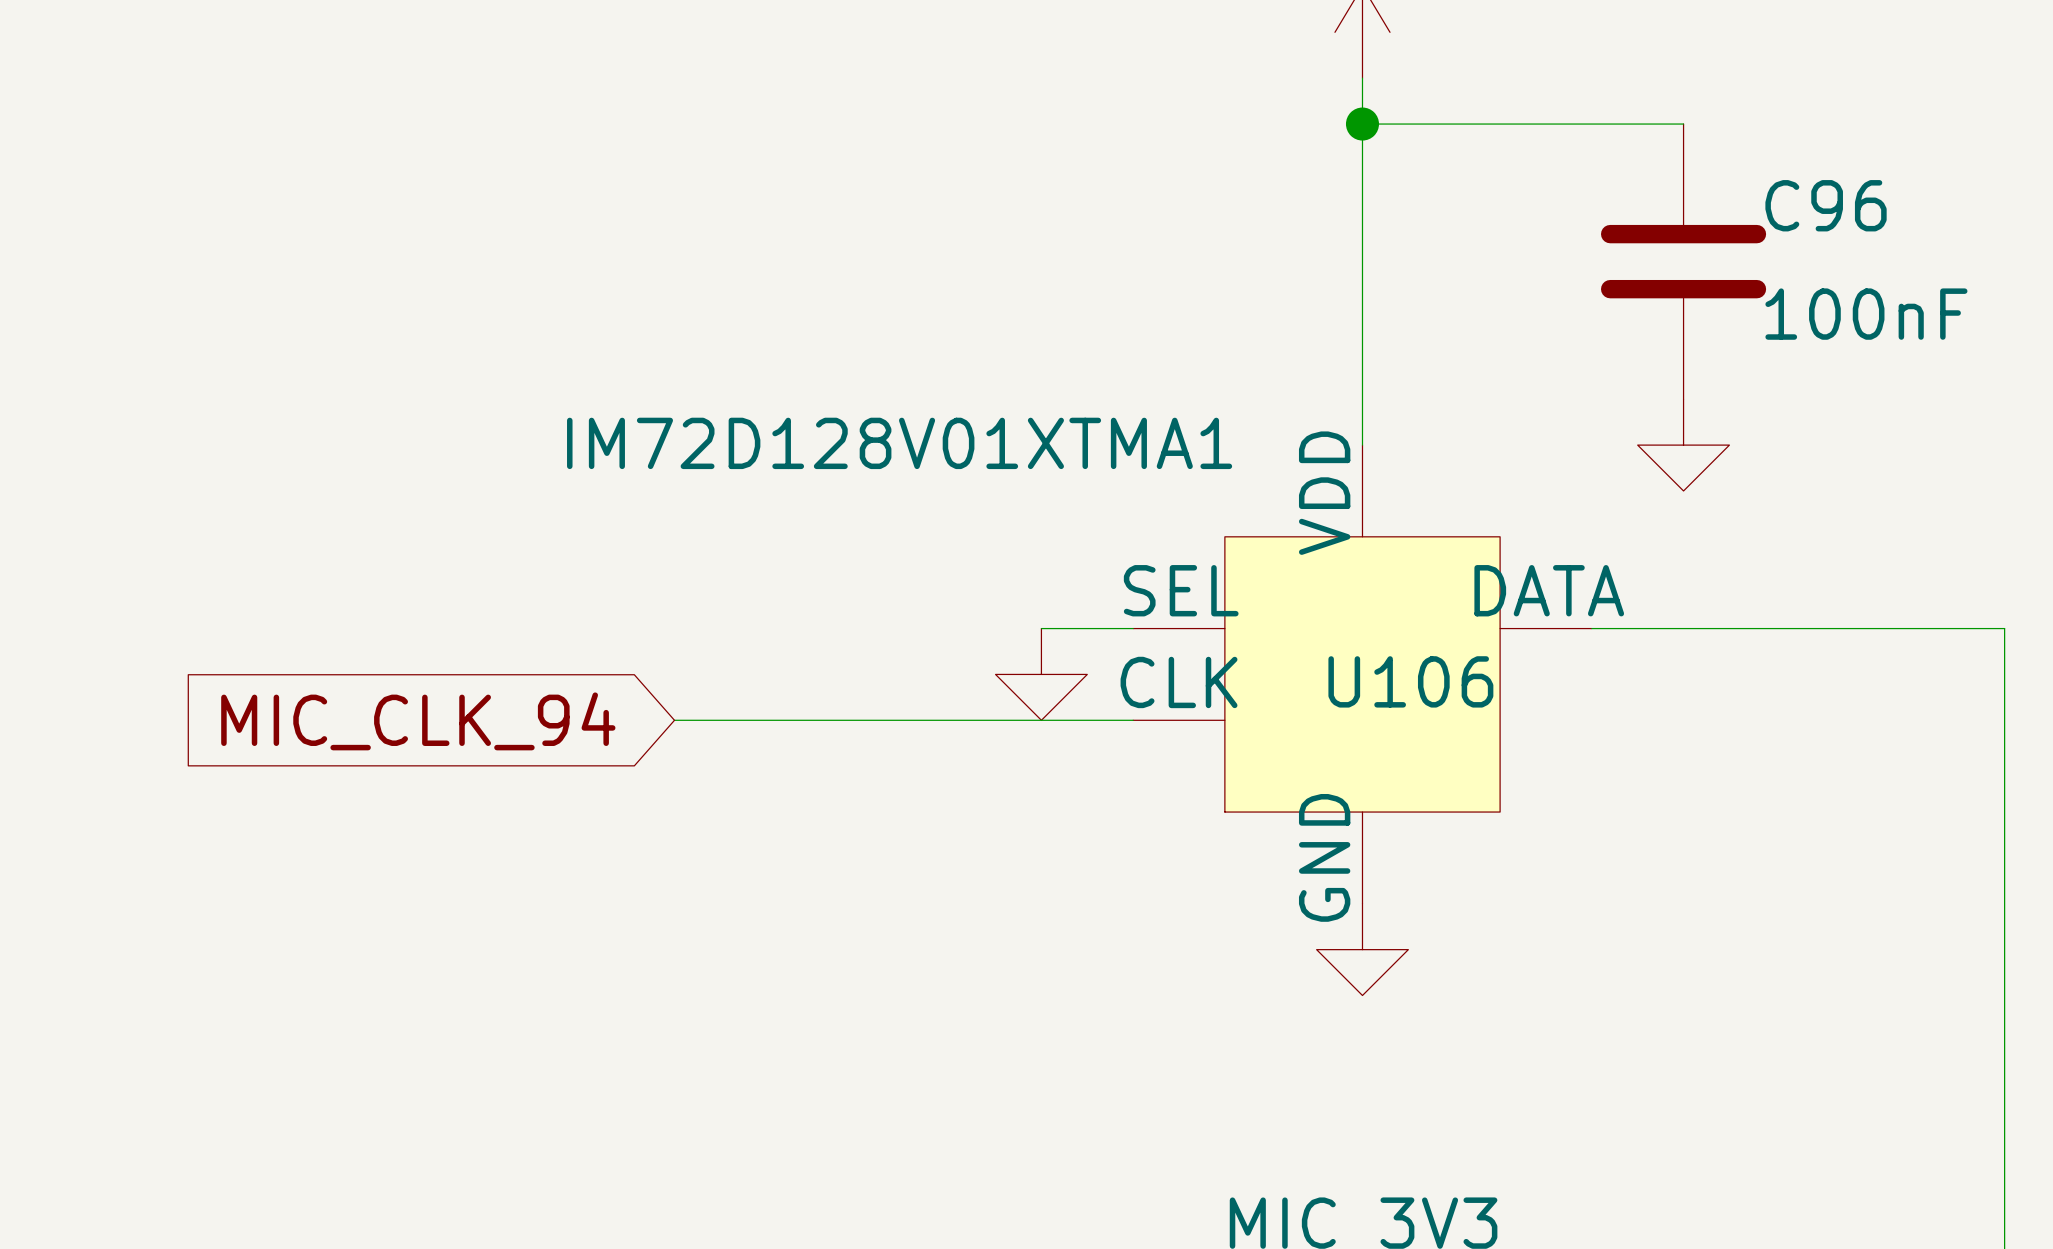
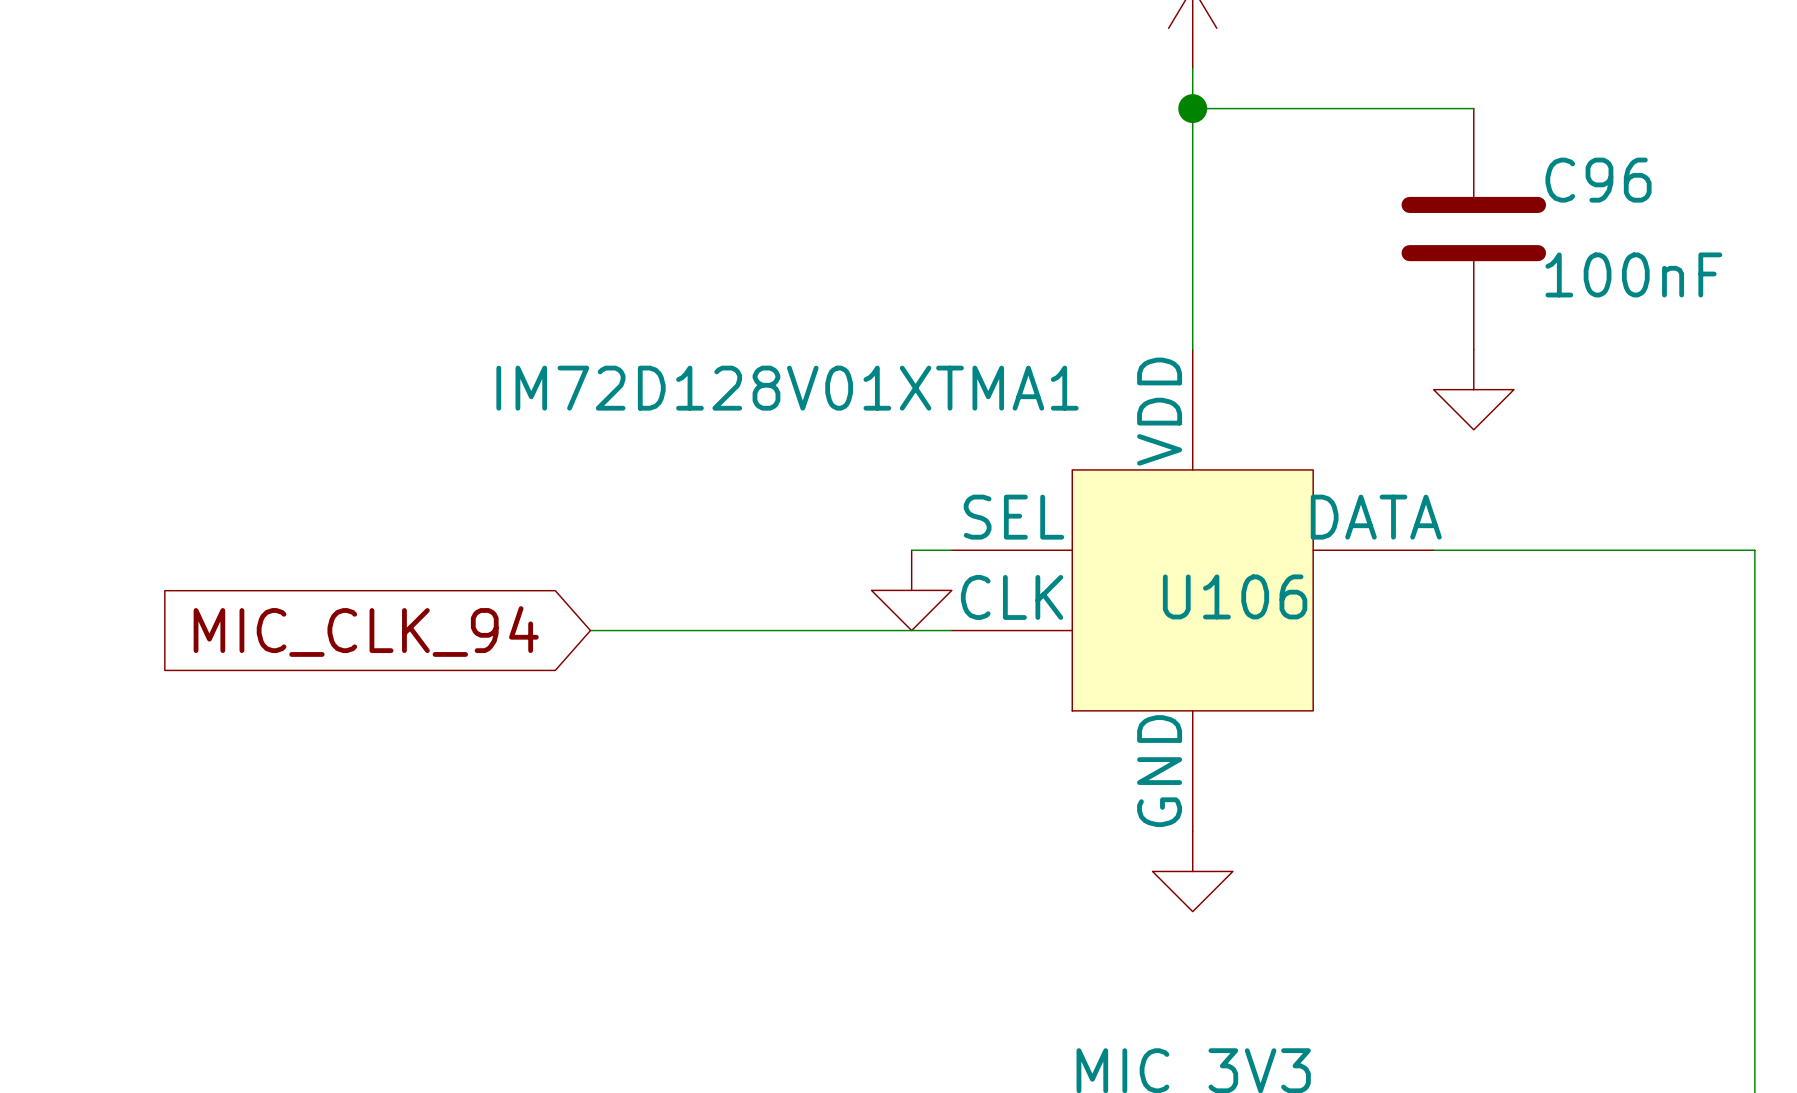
U106 symbol: [1133, 445, 1592, 904] -> [951, 349, 1434, 832]
power symbol position: (1362, 949) -> (1192, 871)

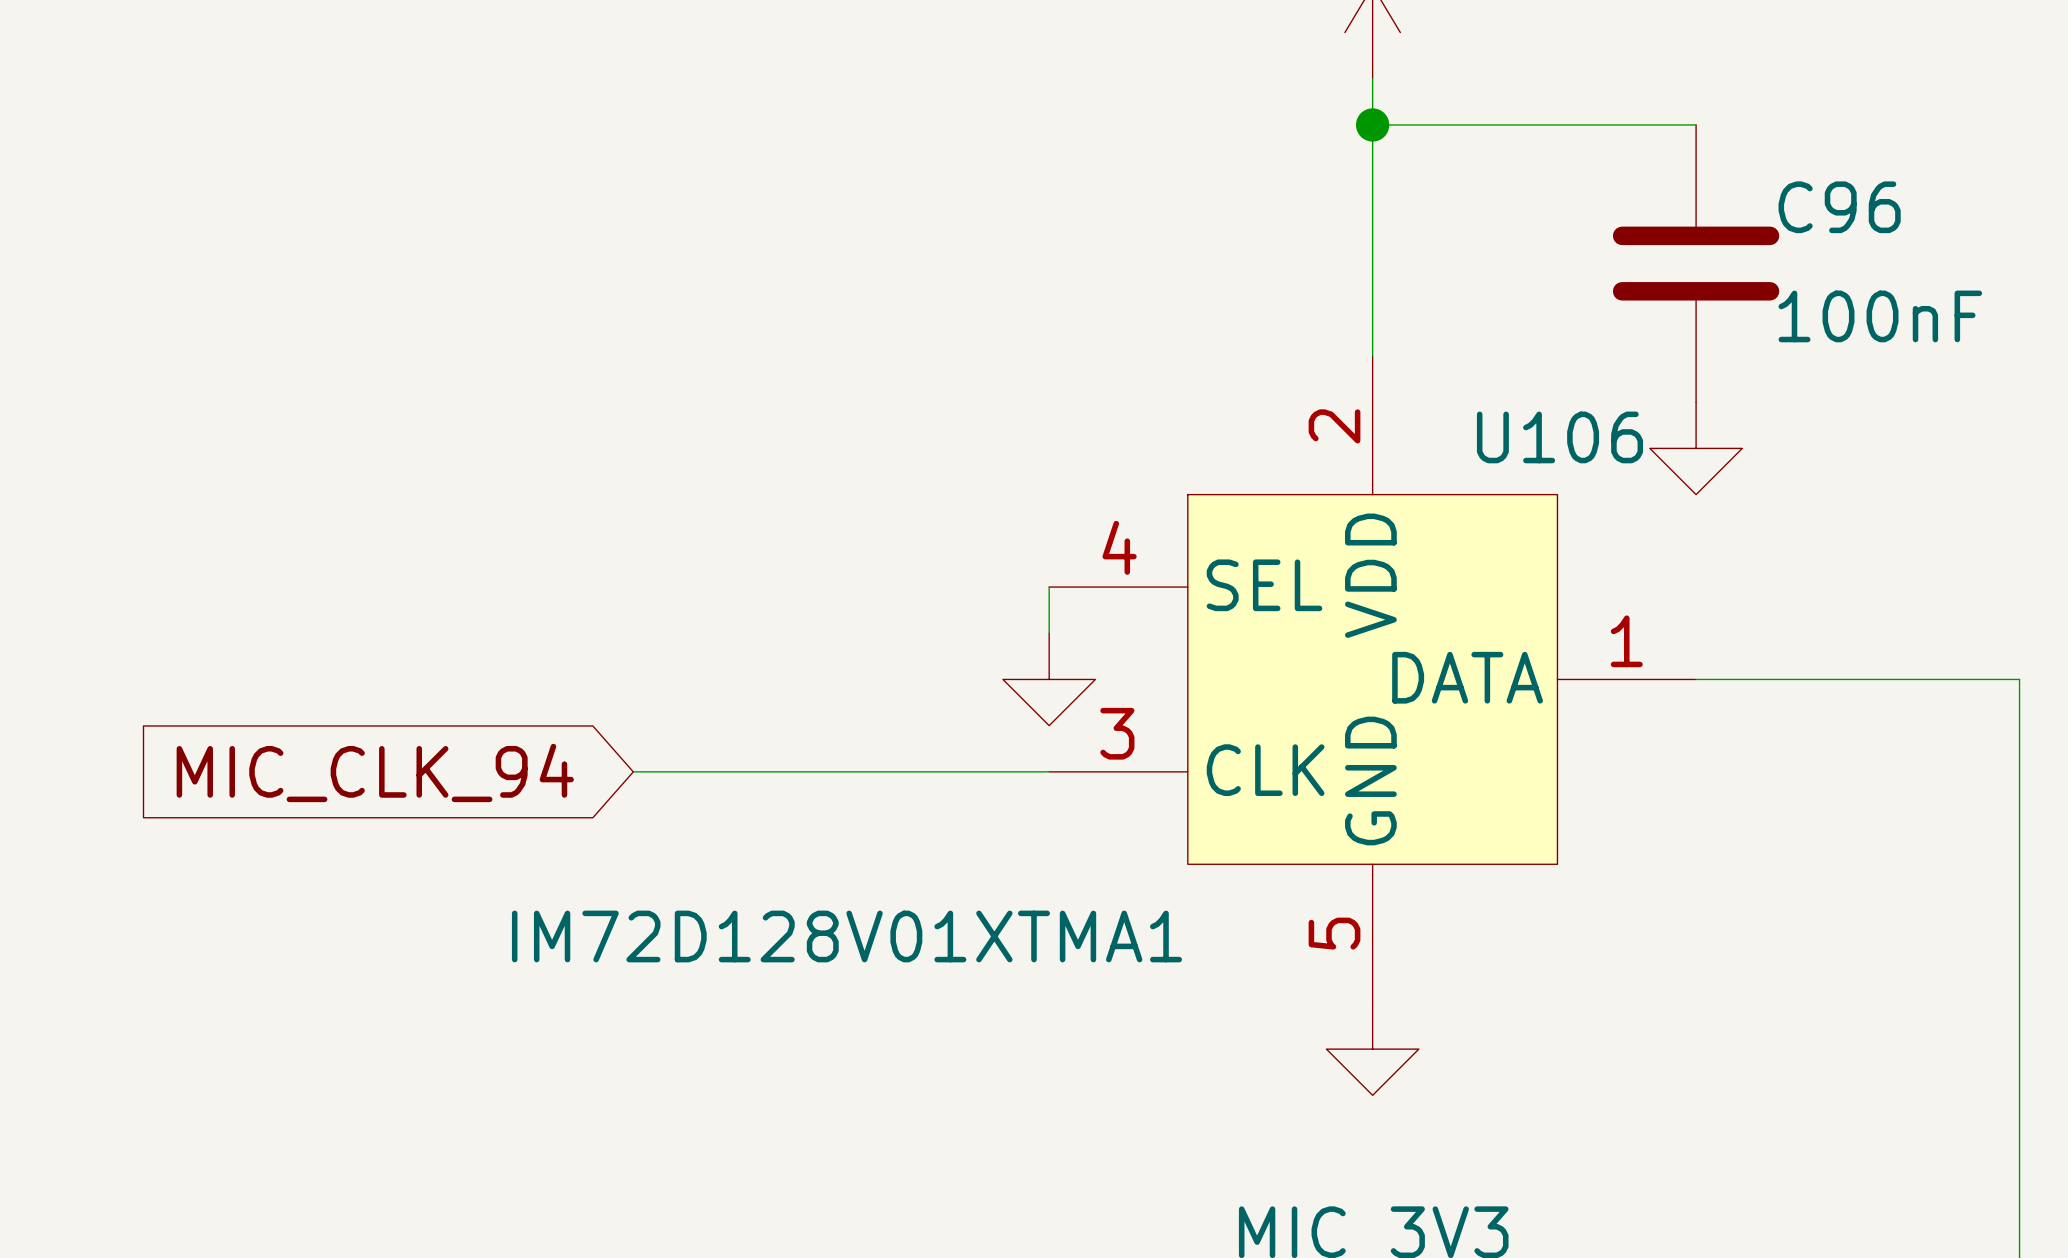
U106 symbol: [951, 349, 1434, 832] -> [1049, 356, 1697, 1003]
U106 value position: IM72D128V01XTMA1 (787, 388) -> IM72D128V01XTMA1 (846, 936)
wire: (911, 550) (951, 550) -> (1049, 633) (1049, 587)
wire: (1433, 550) (1754, 550) (1754, 590) -> (1696, 679) (2019, 679)
U106 name position: U106 (1235, 596) -> U106 (1560, 437)
wire: (590, 630) (951, 630) -> (633, 771) (1049, 771)
global label position: MIC_CLK_94 (366, 631) -> MIC_CLK_94 (375, 772)
power symbol position: (1192, 871) -> (1372, 1049)

